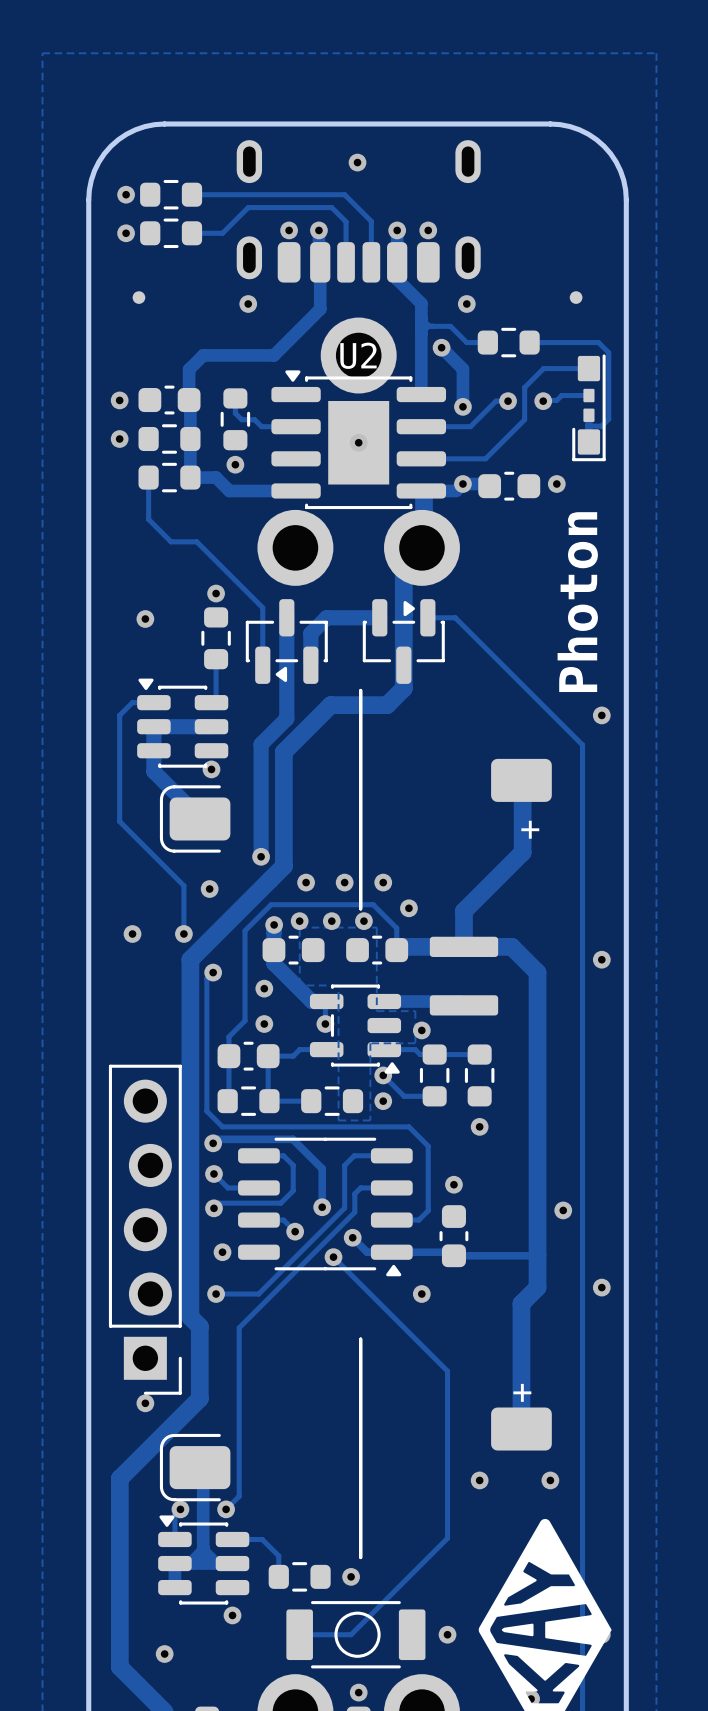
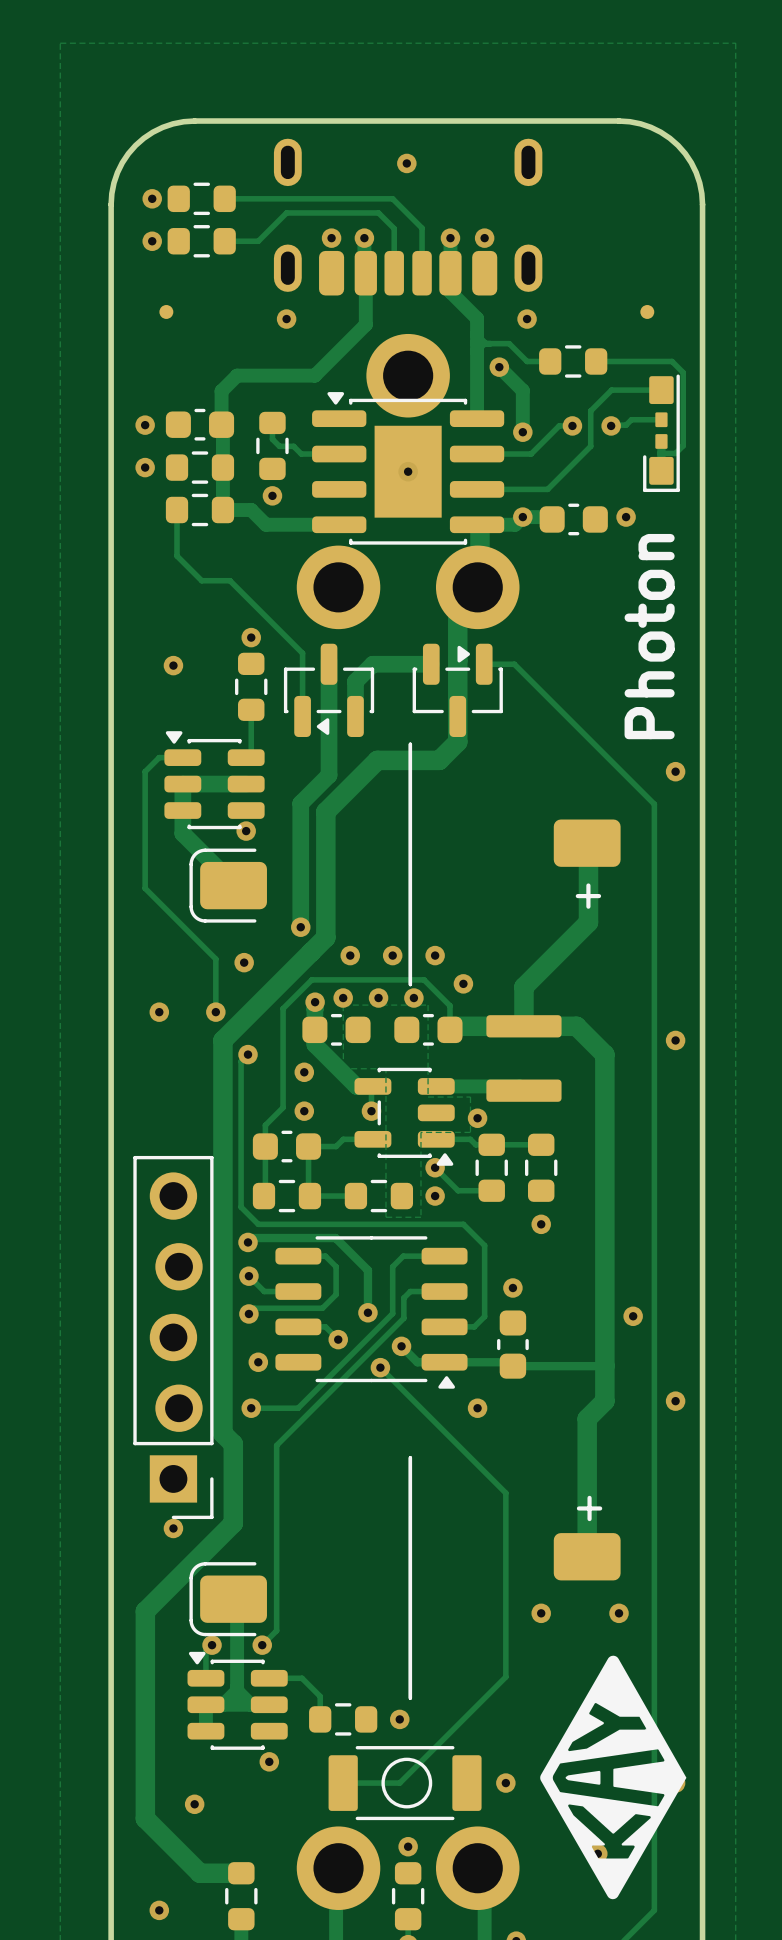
U2 name: U2 (358, 355) -> none

